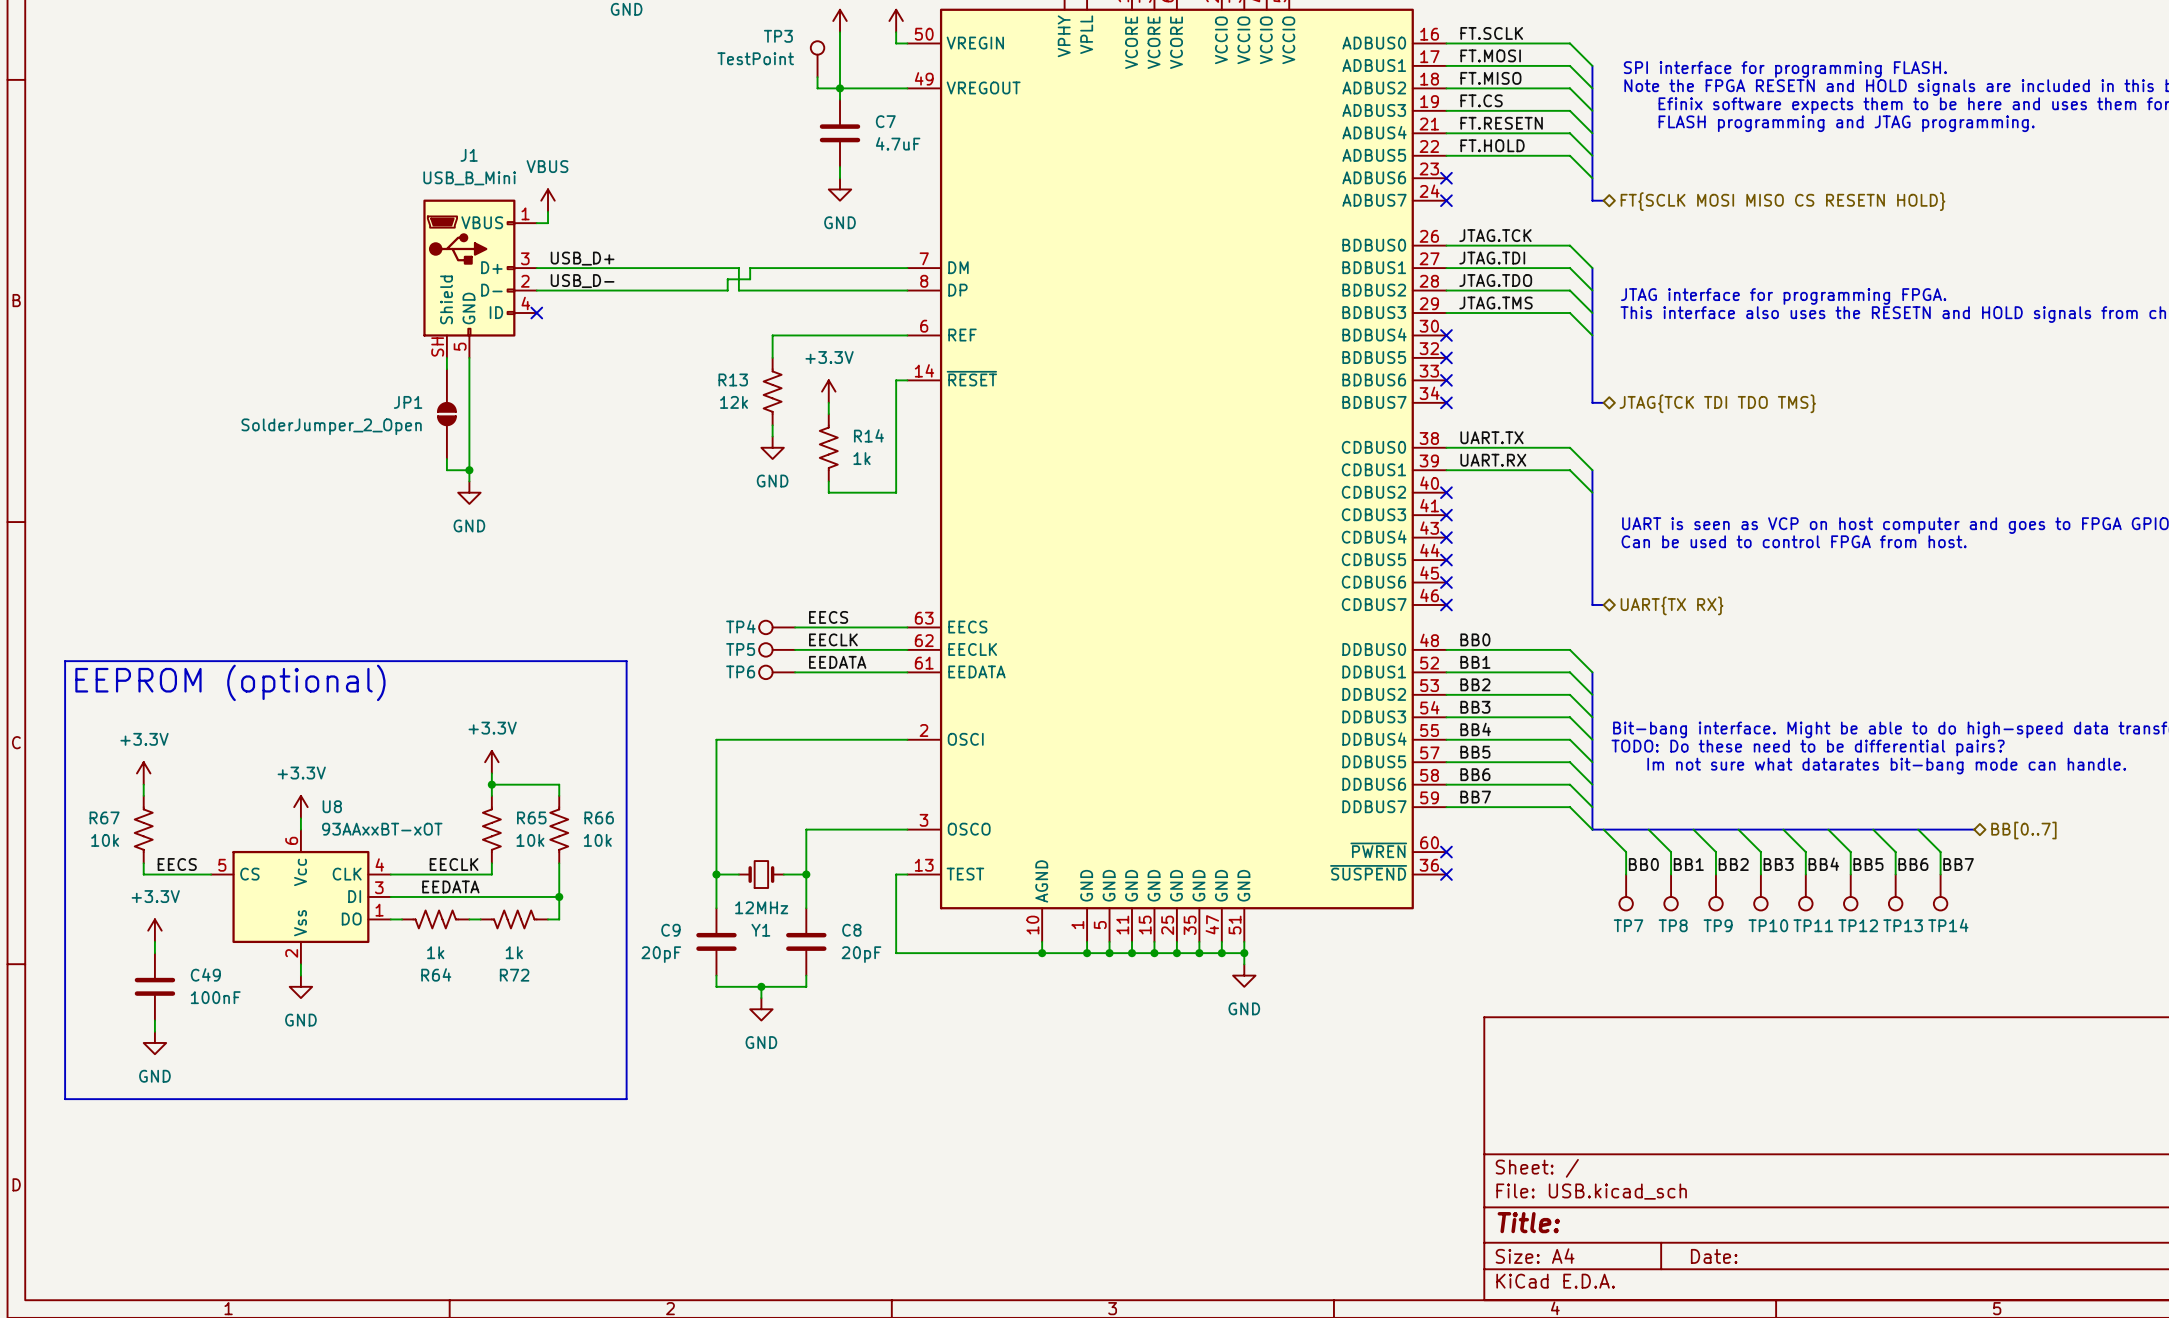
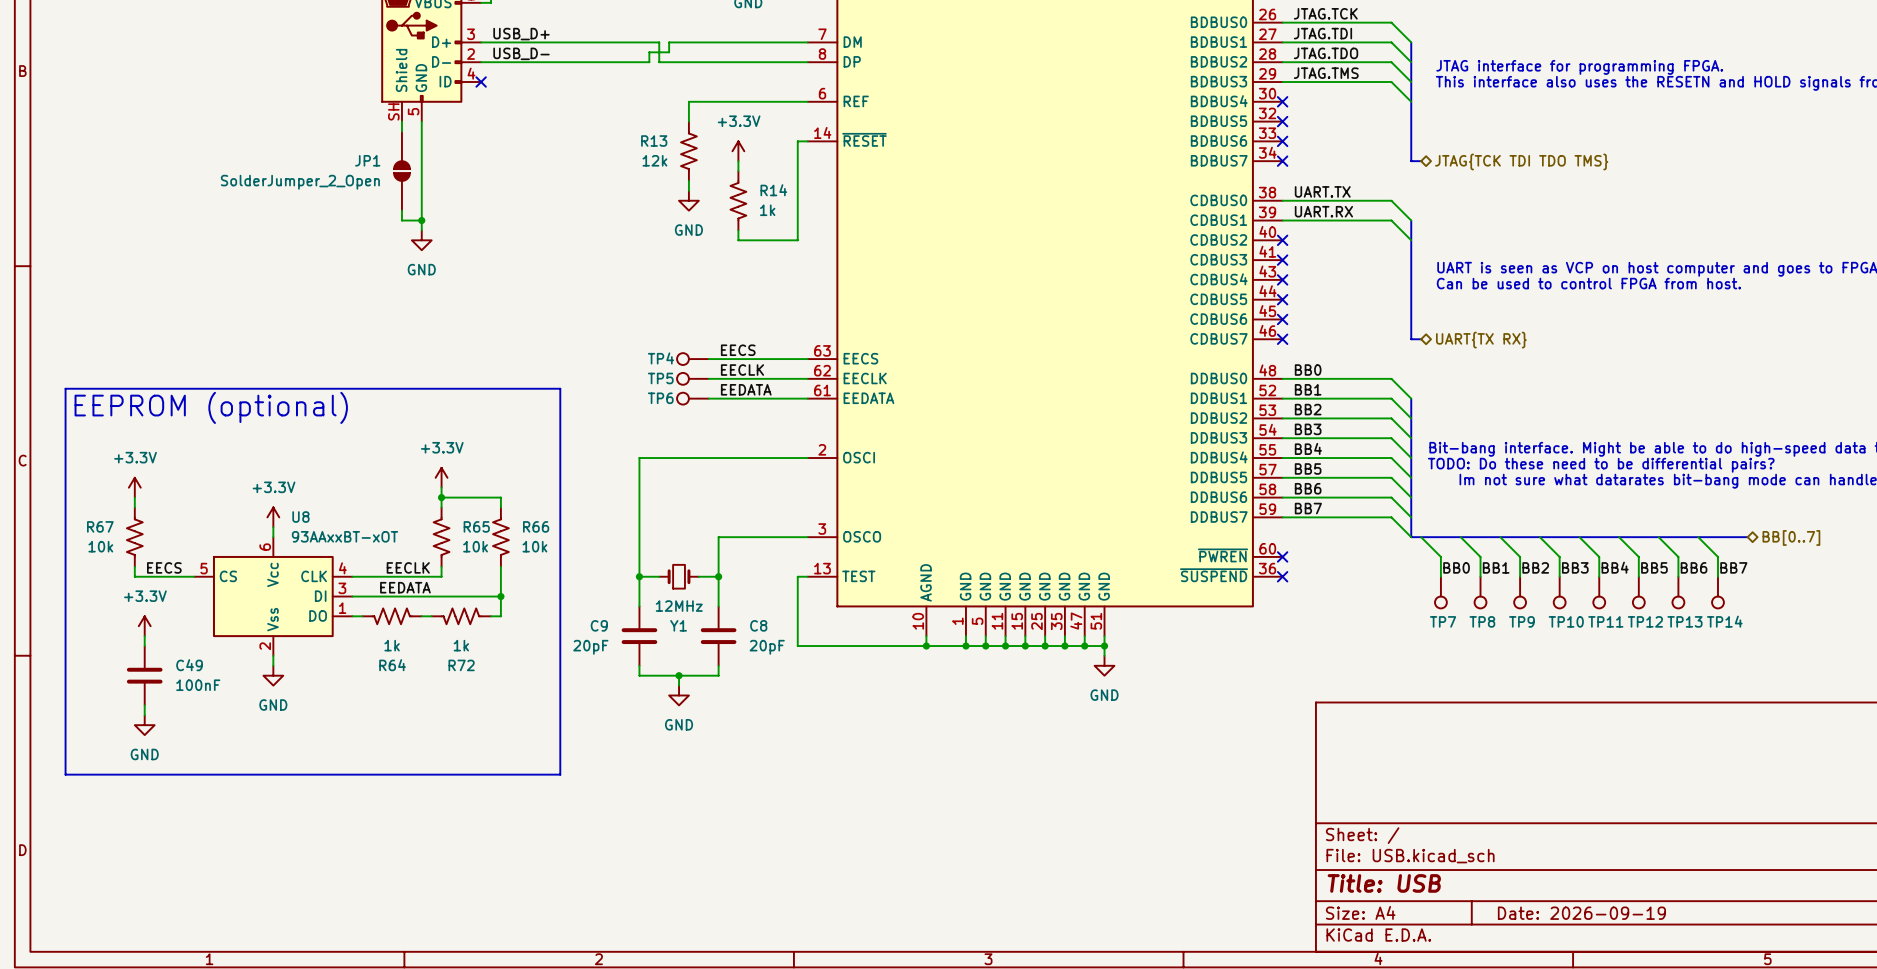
title block: Title: (1528, 1222) -> Title: USB (1384, 883)
title block: Date: (1714, 1256) -> Date: 2026-09-19 (1581, 913)

